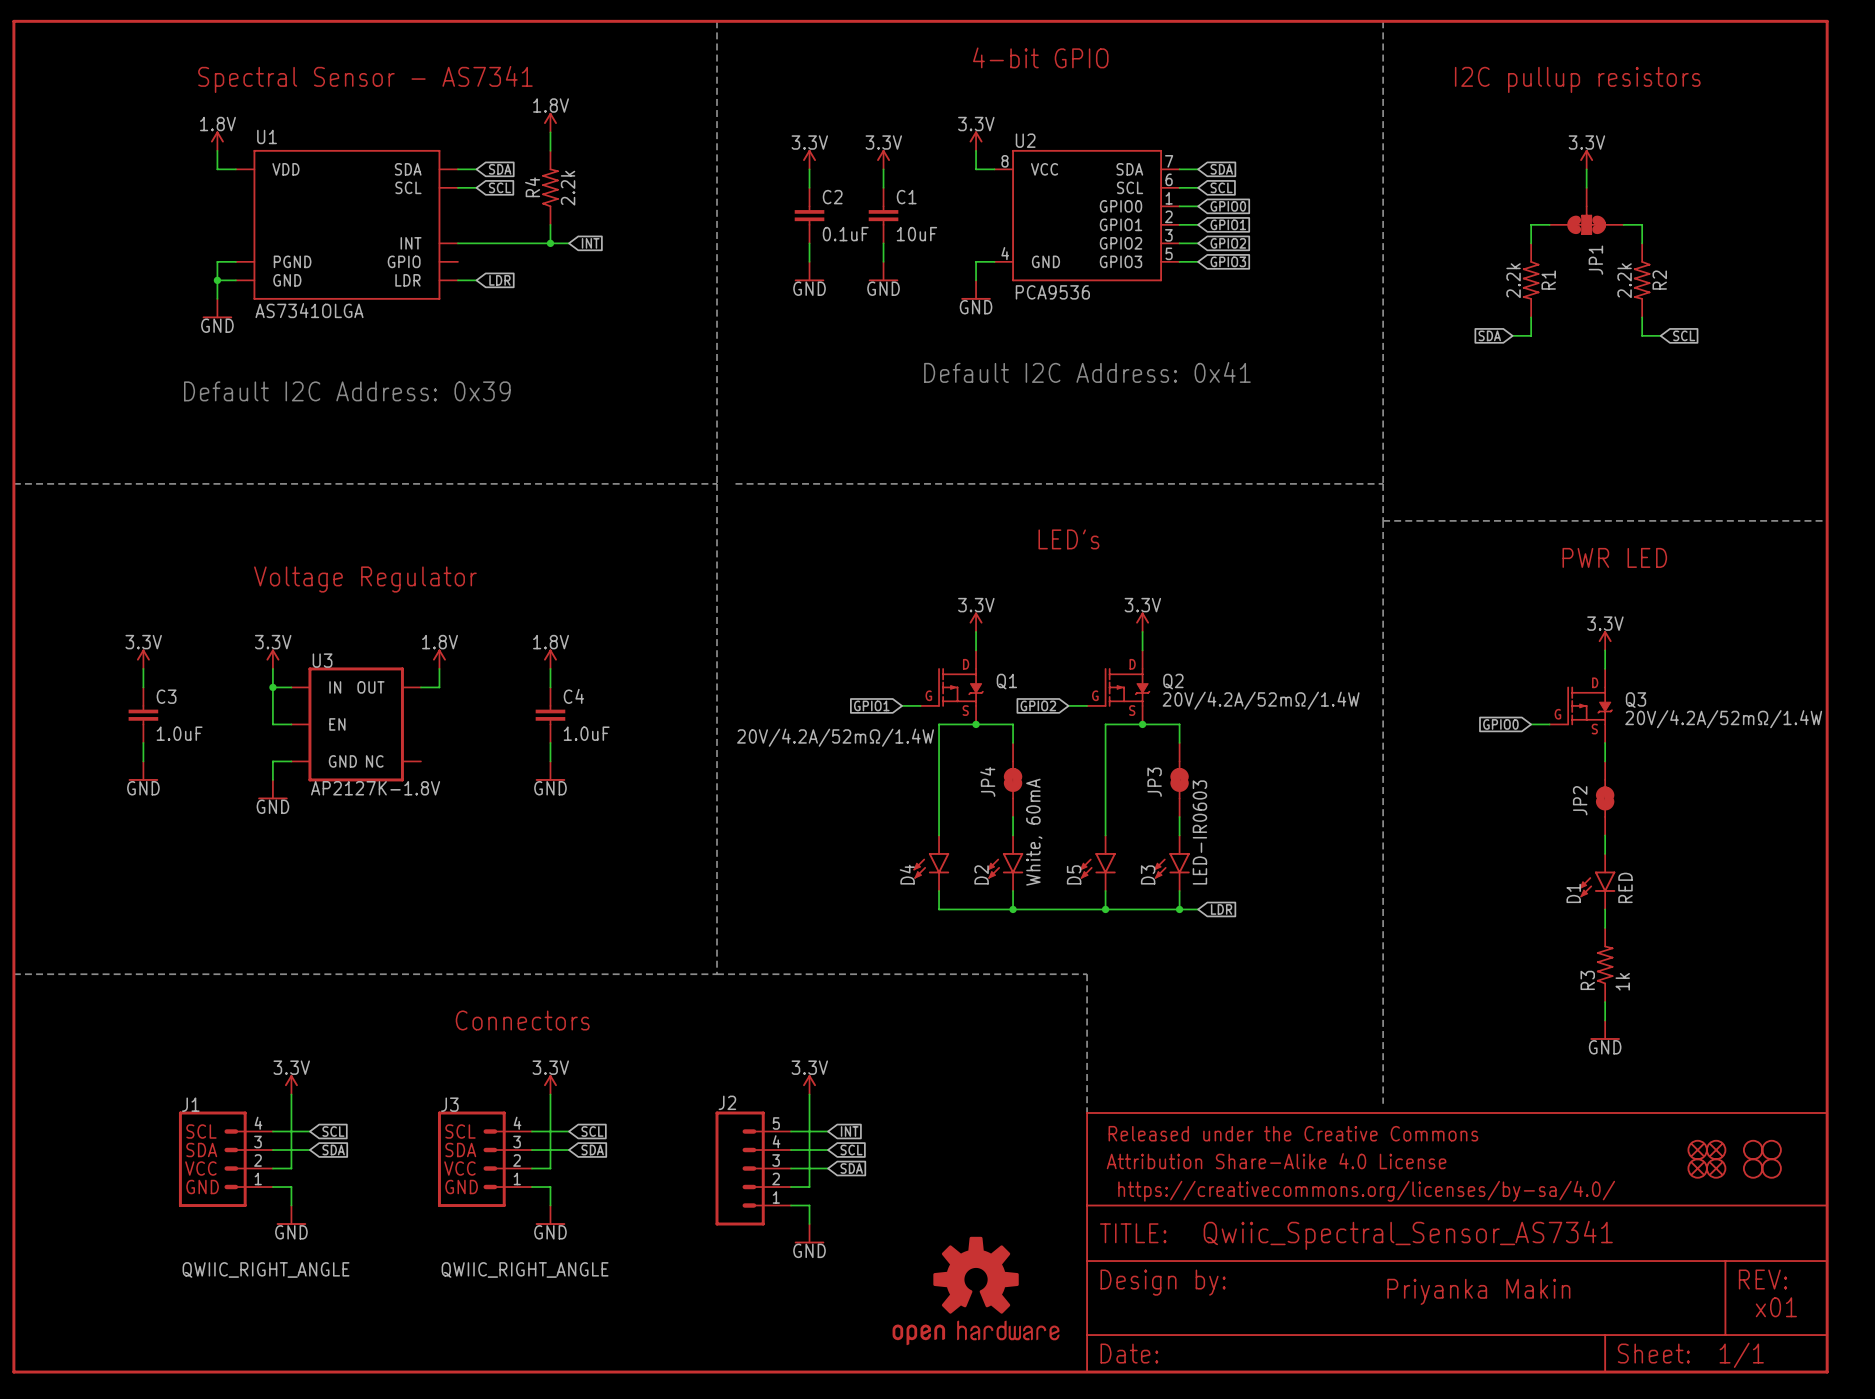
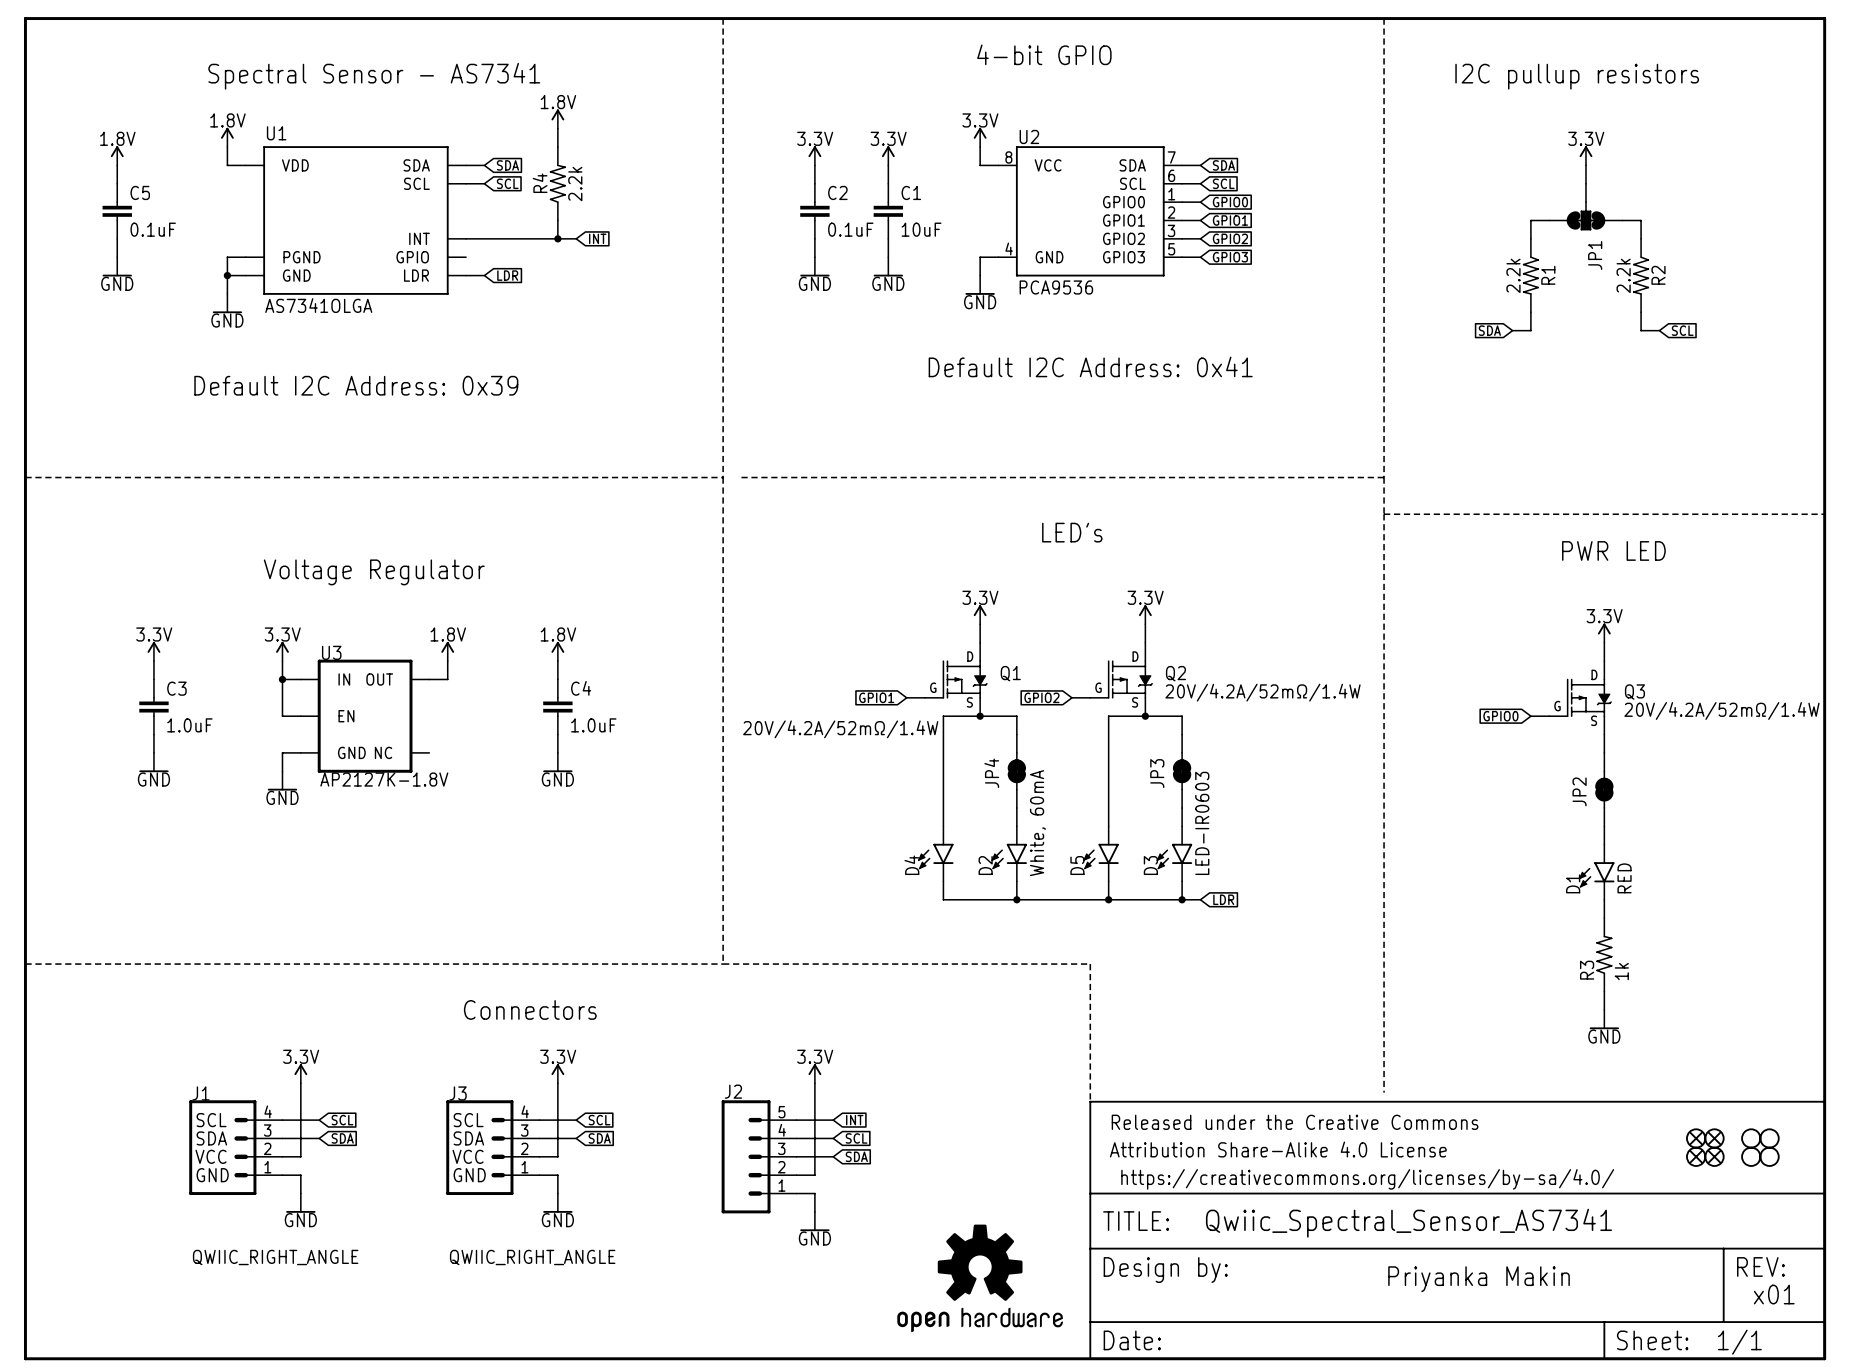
power symbol: none -> 1.8V (117, 155)
wire: none -> (117, 165) (117, 183)
C5: none -> 0.1uF (117, 211)
wire: none -> (117, 238) (117, 257)
power symbol: none -> GND (117, 266)

